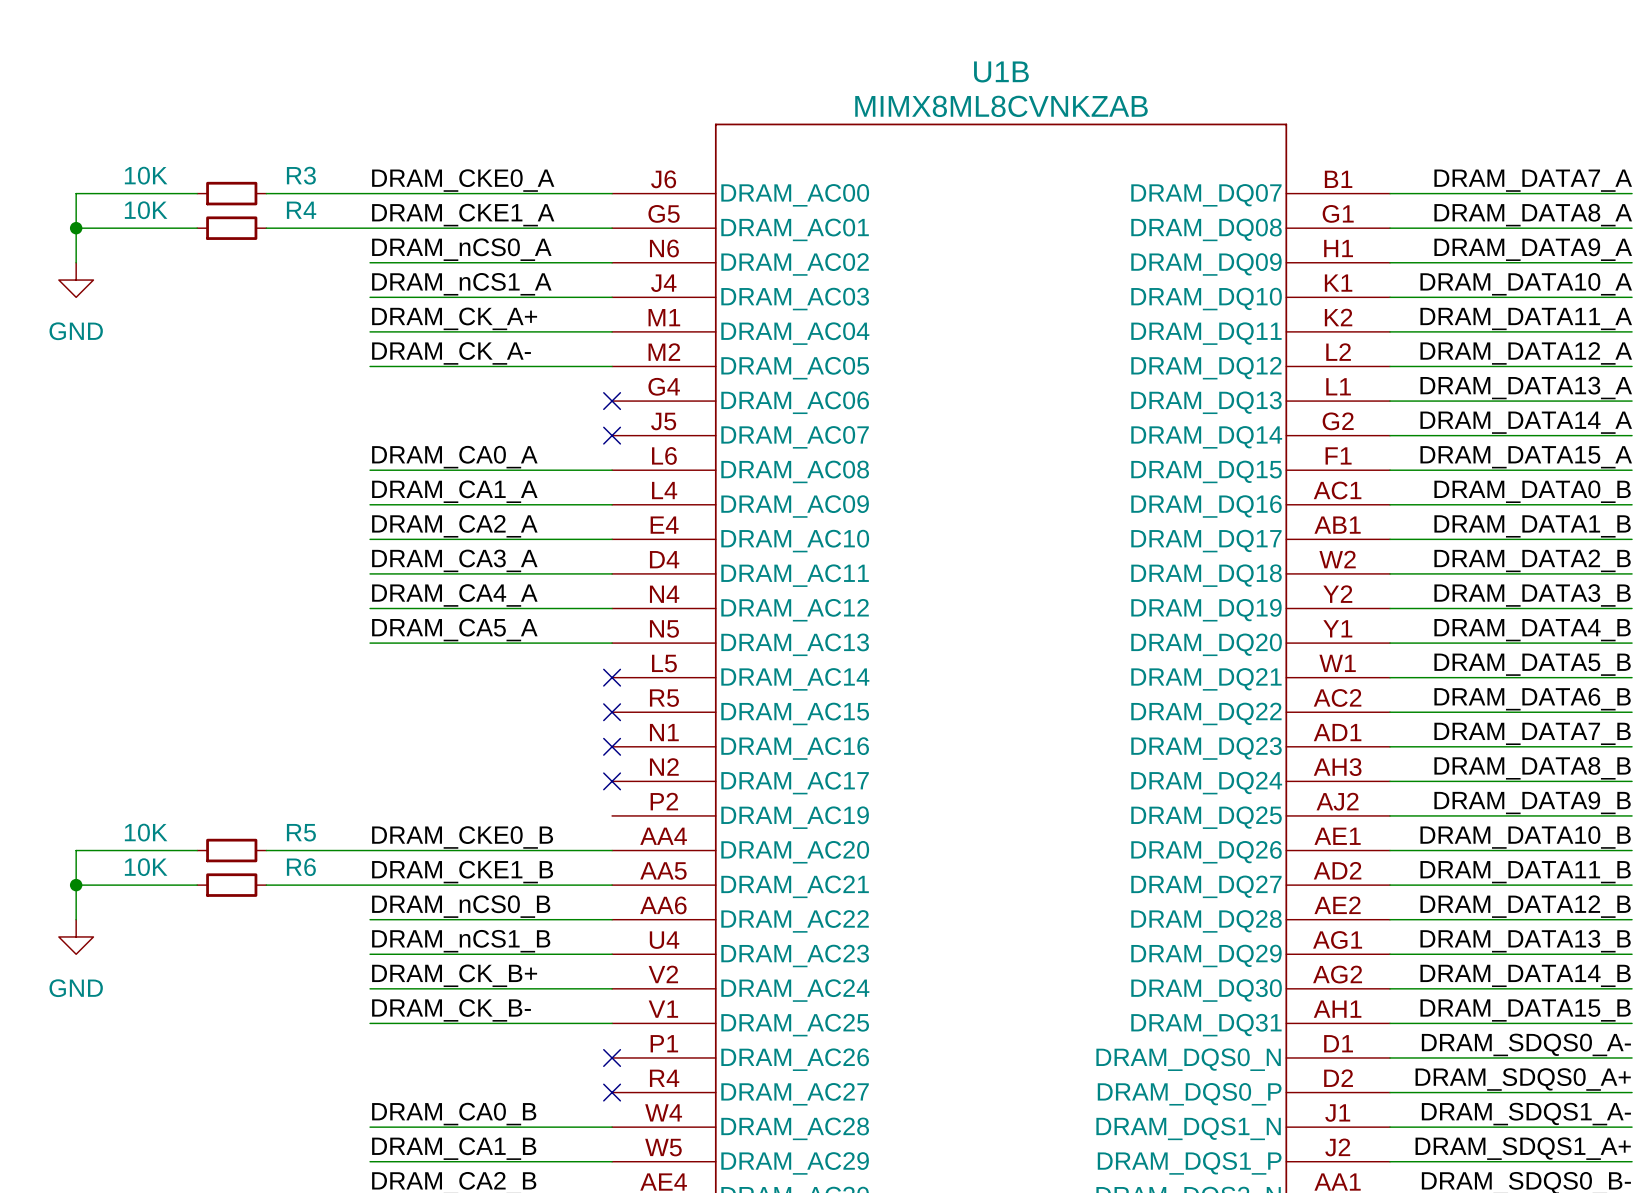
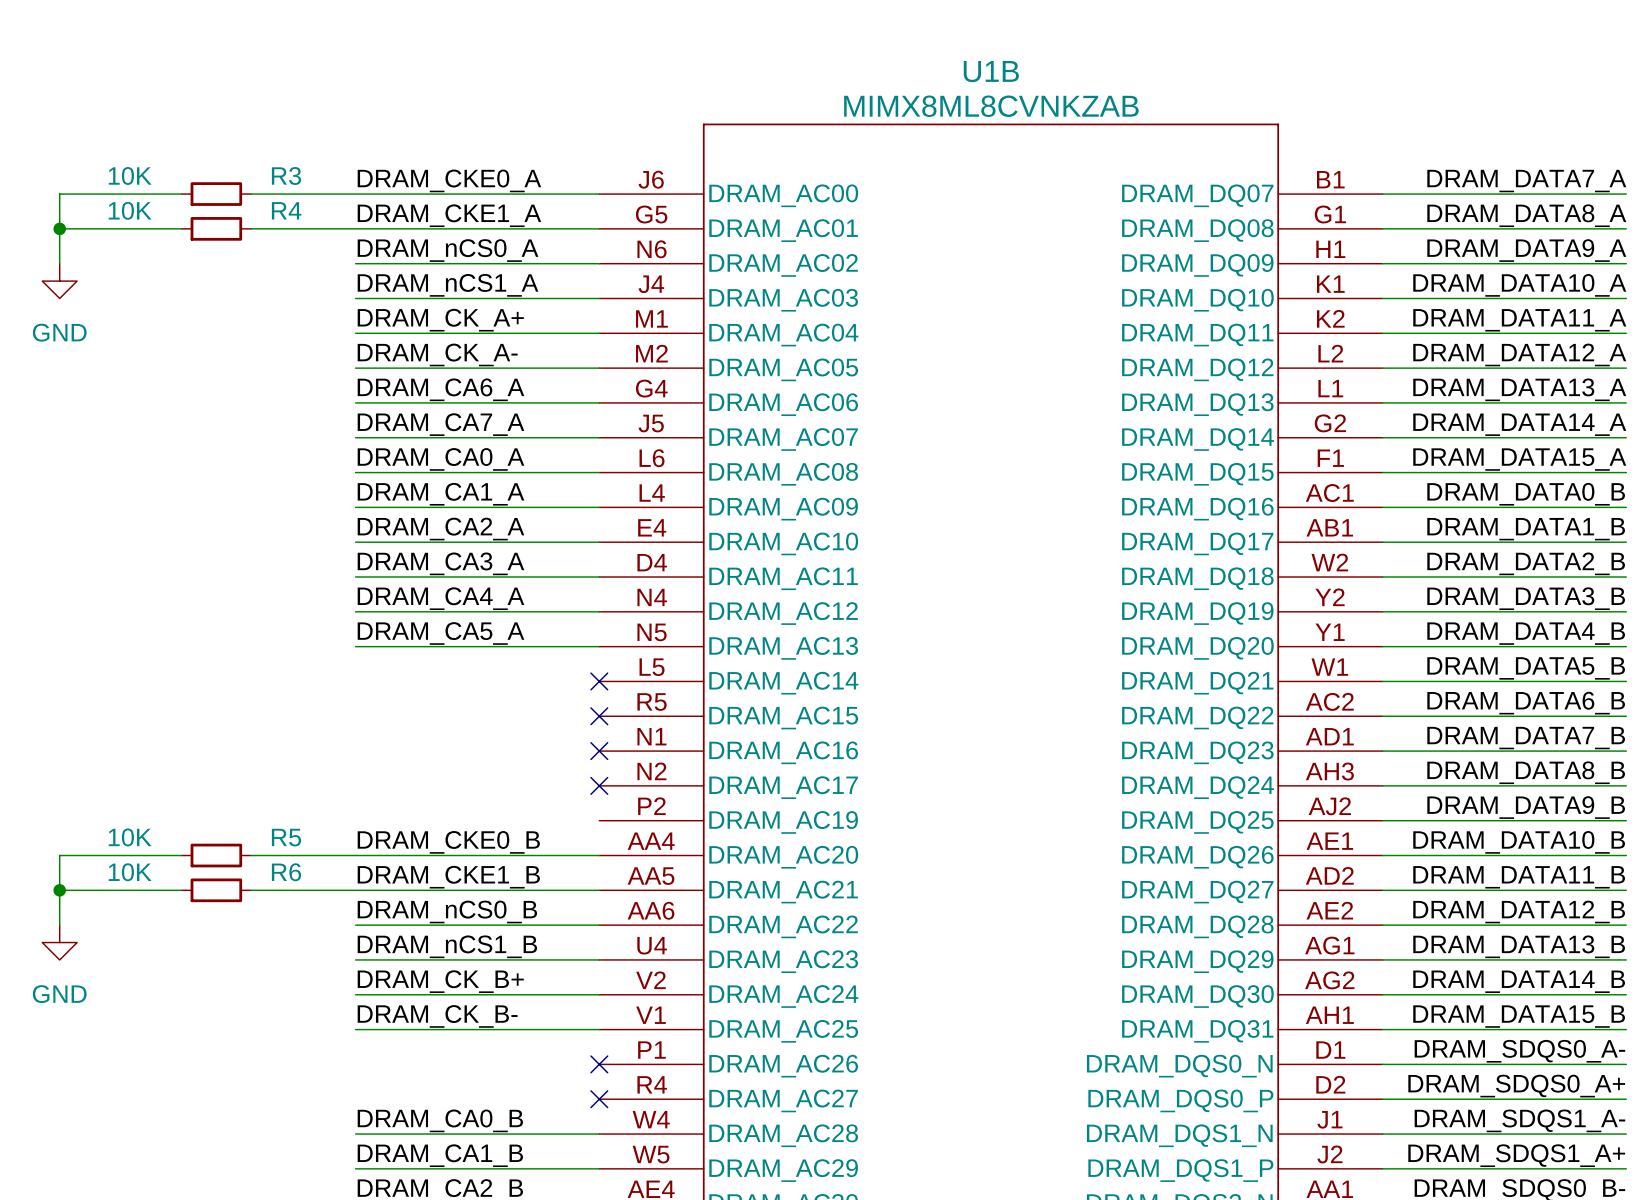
label: none -> DRAM_CA6_A (441, 389)
wire: none -> (355, 402) (599, 402)
no-connect mark: (612, 401) -> none
label: none -> DRAM_CA7_A (441, 424)
wire: none -> (355, 437) (599, 437)
no-connect mark: (612, 435) -> none

